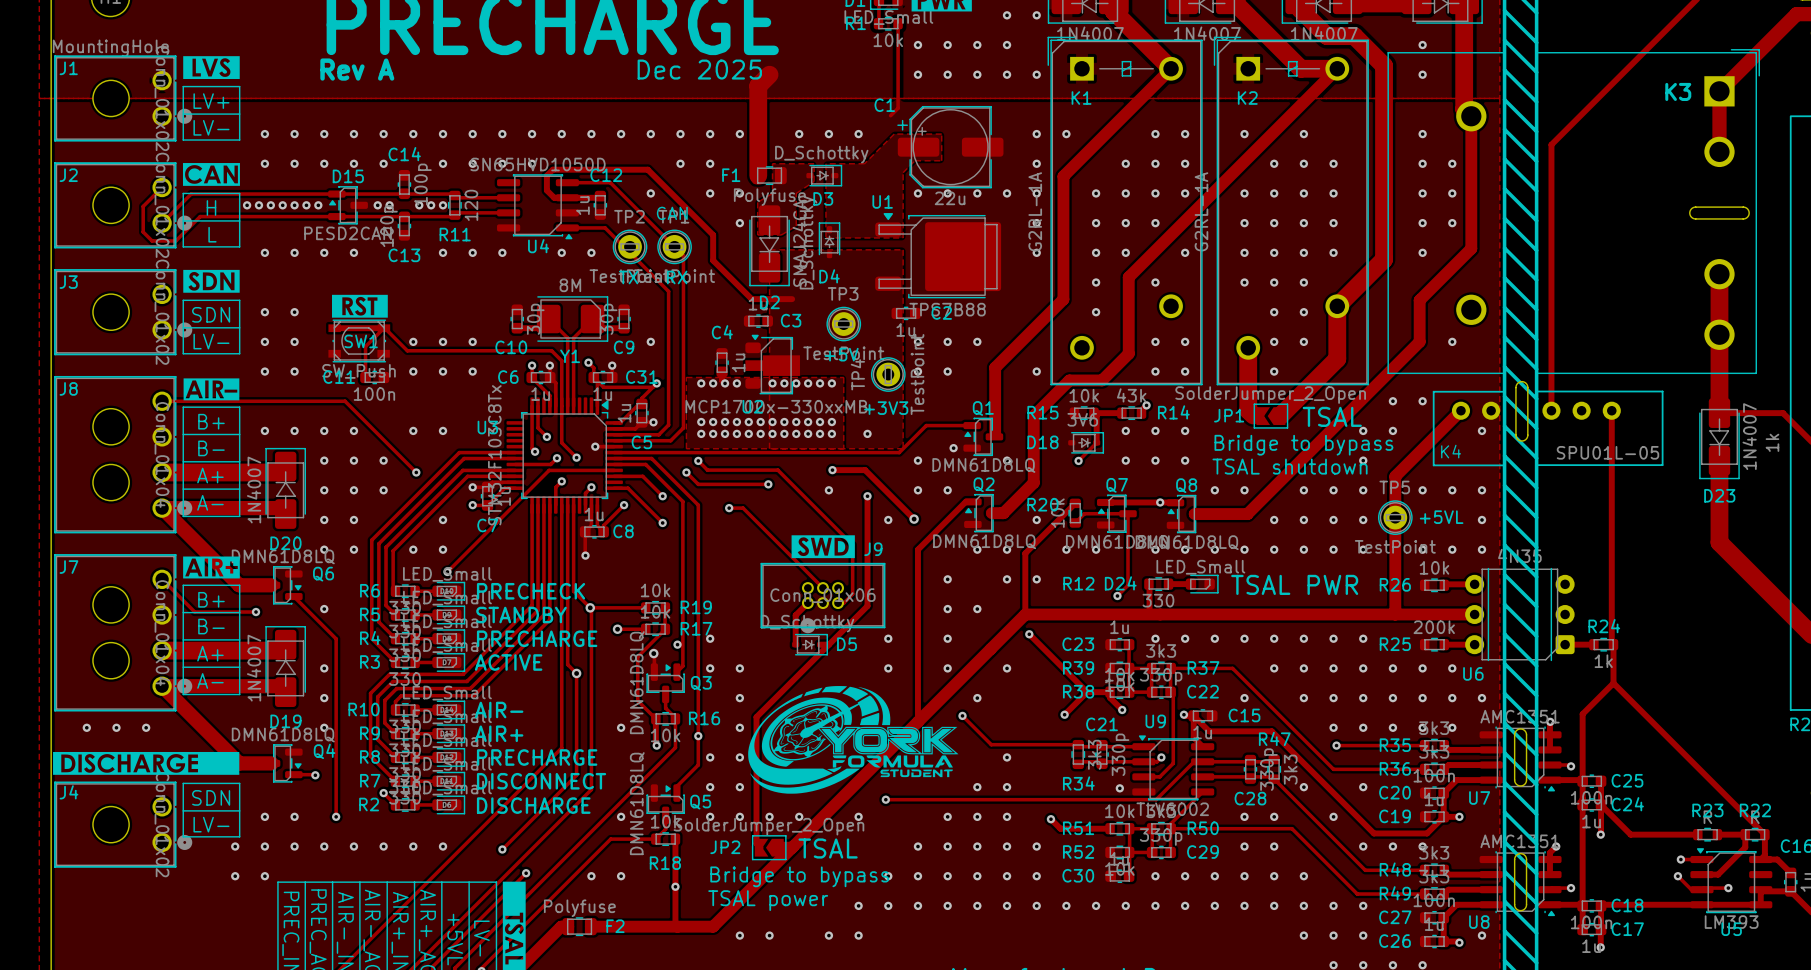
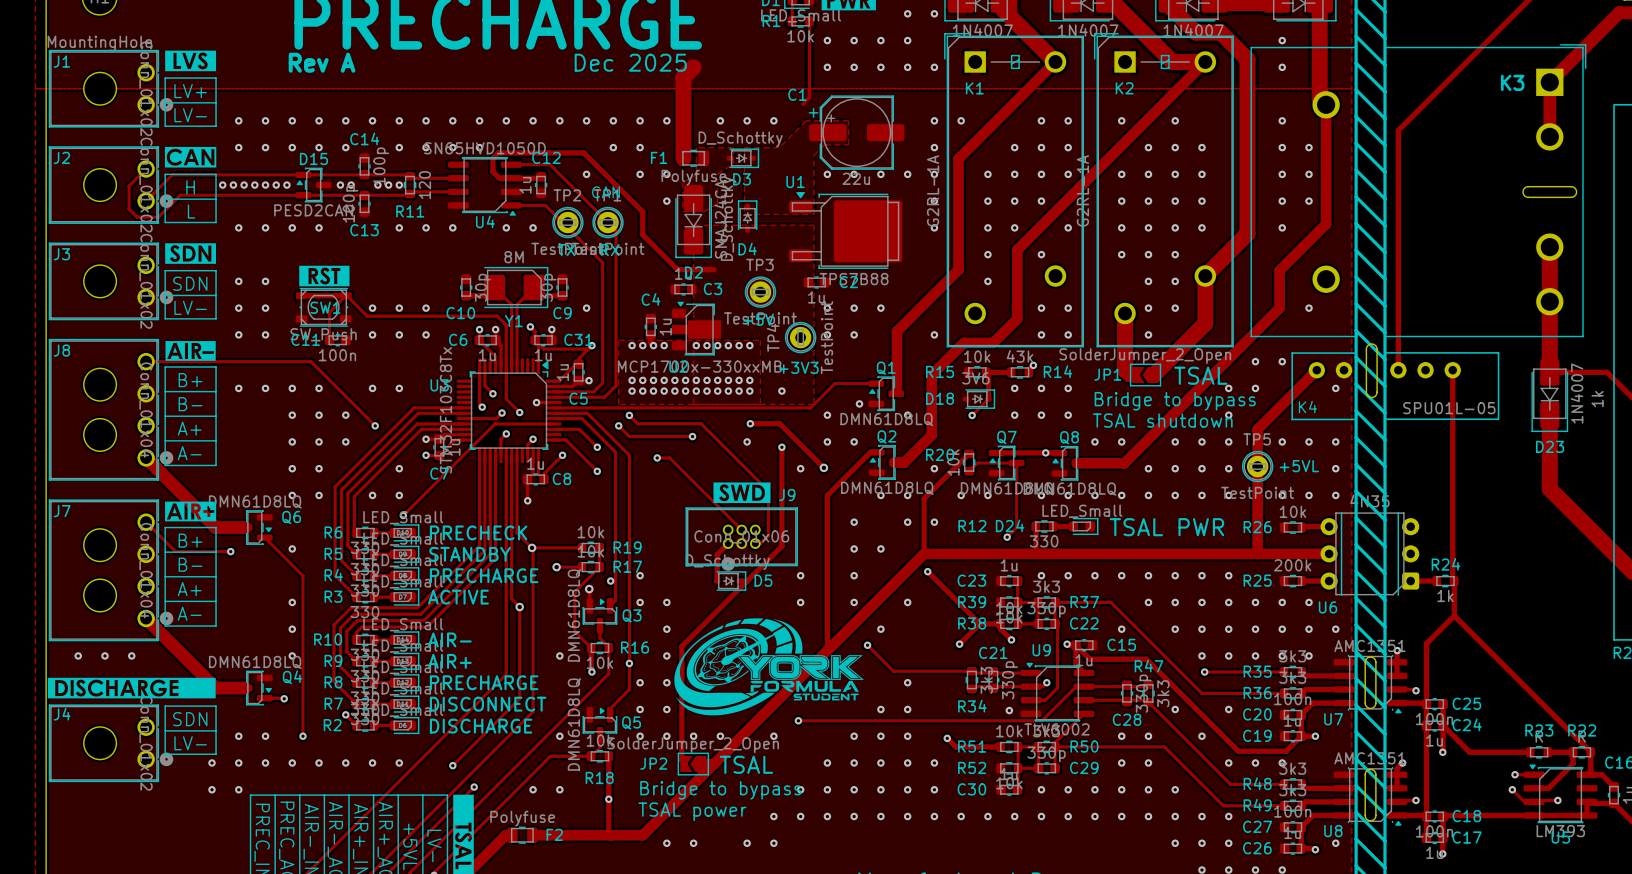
track: (285, 465) (278, 472) (162, 472) -> none
D20: 1N4007 (285, 488) -> none
track: (162, 508) (280, 508) (285, 512) -> none
track: (285, 643) (278, 650) (162, 650) -> none
D19: 1N4007 (285, 666) -> none
track: (162, 686) (280, 686) (285, 690) -> none

